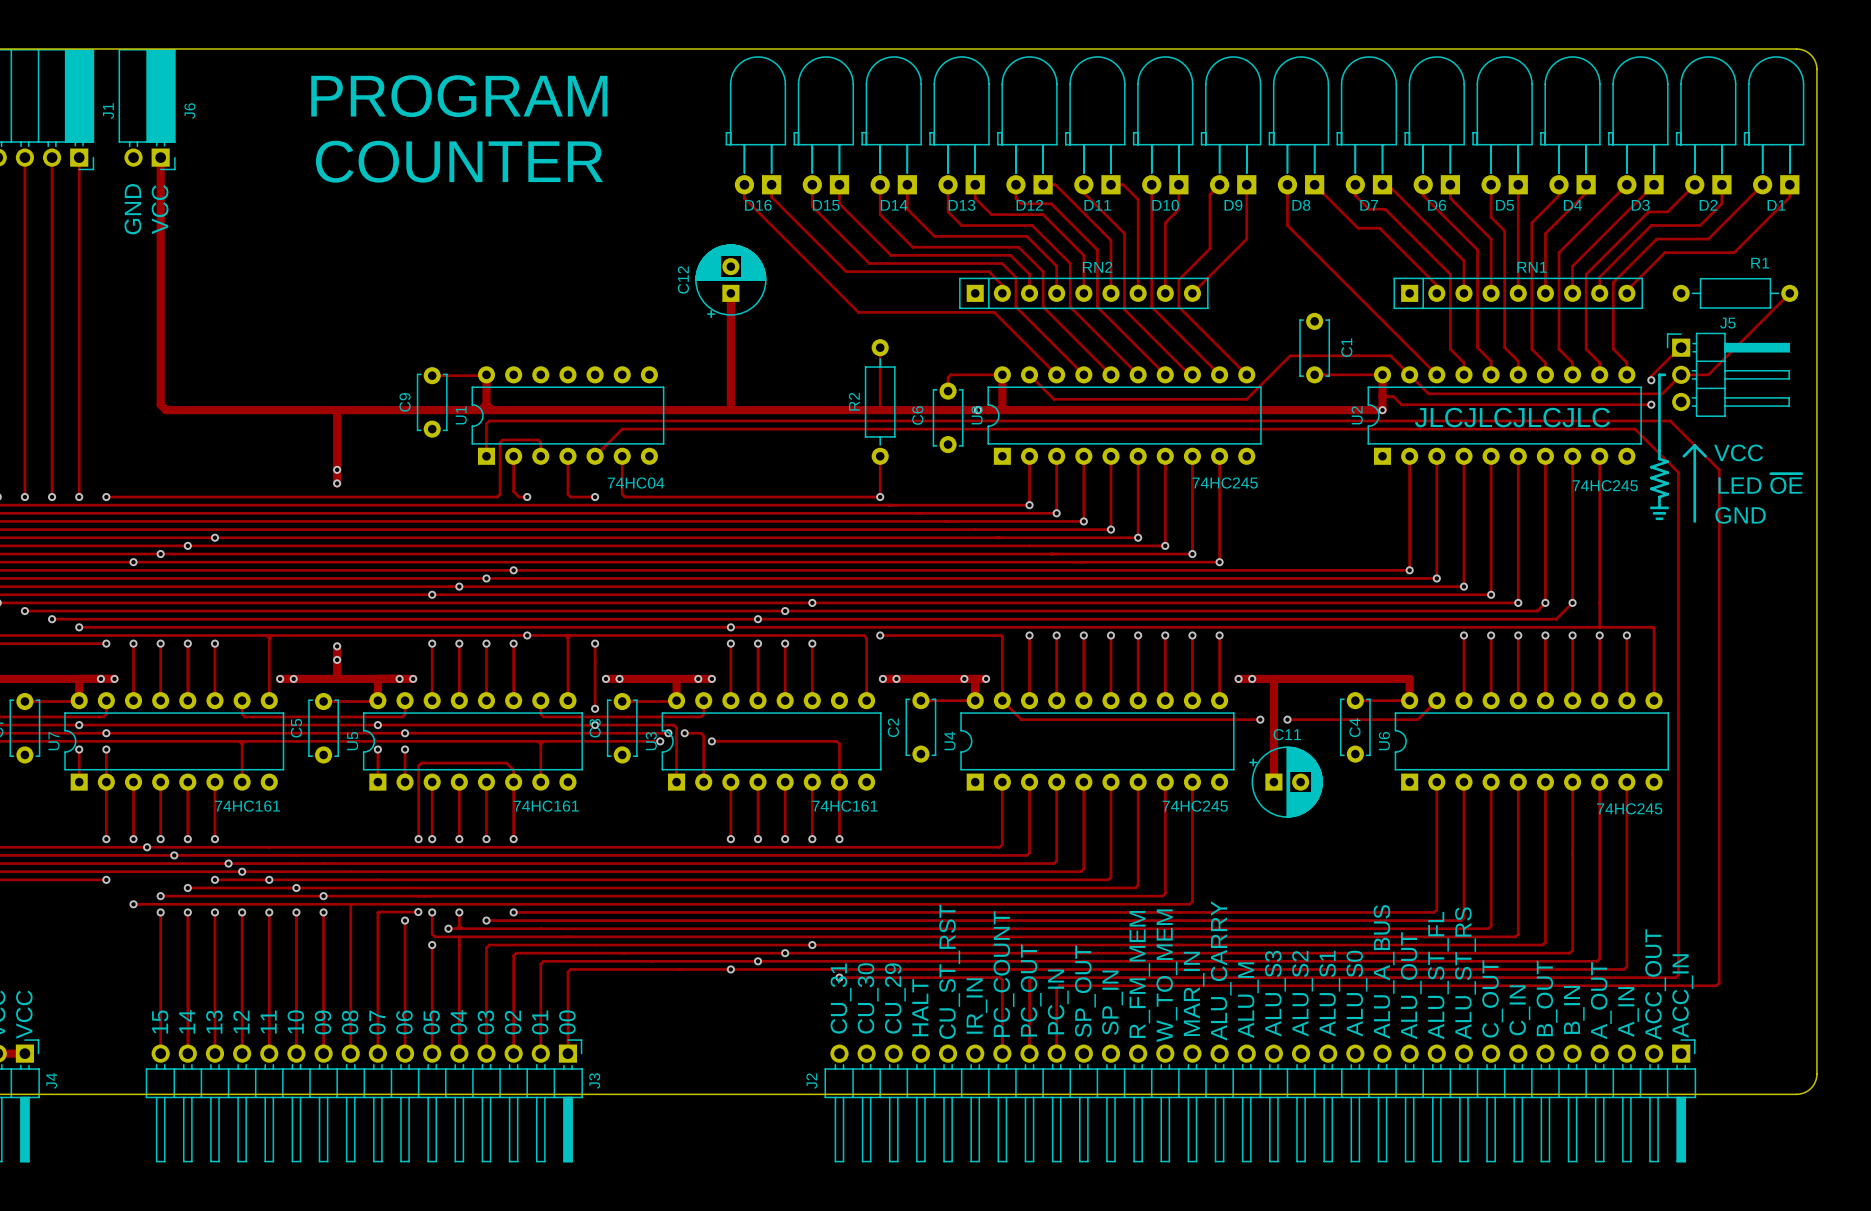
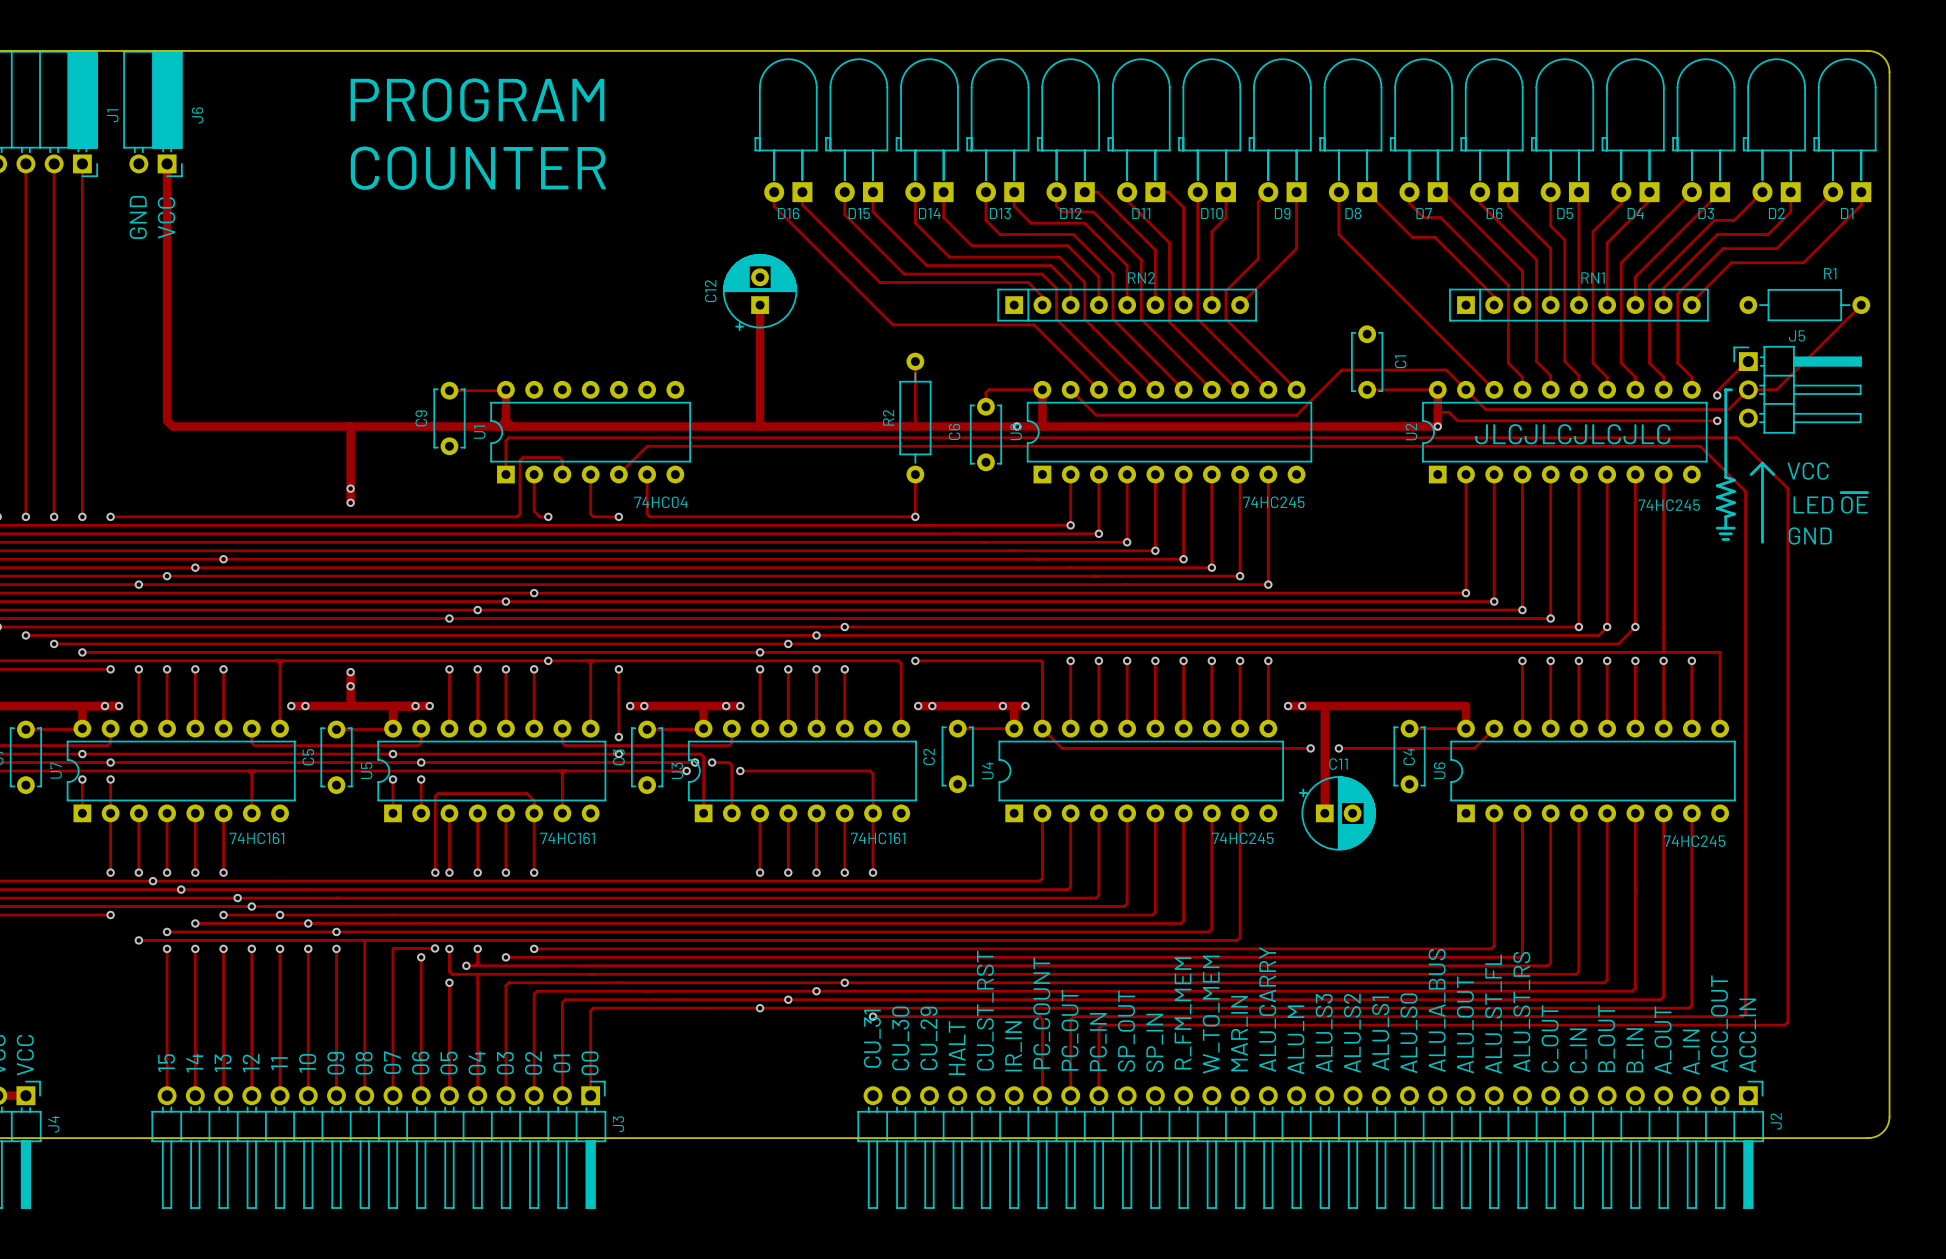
J2 name position: J2 (811, 1081) -> J2 (1776, 1121)

